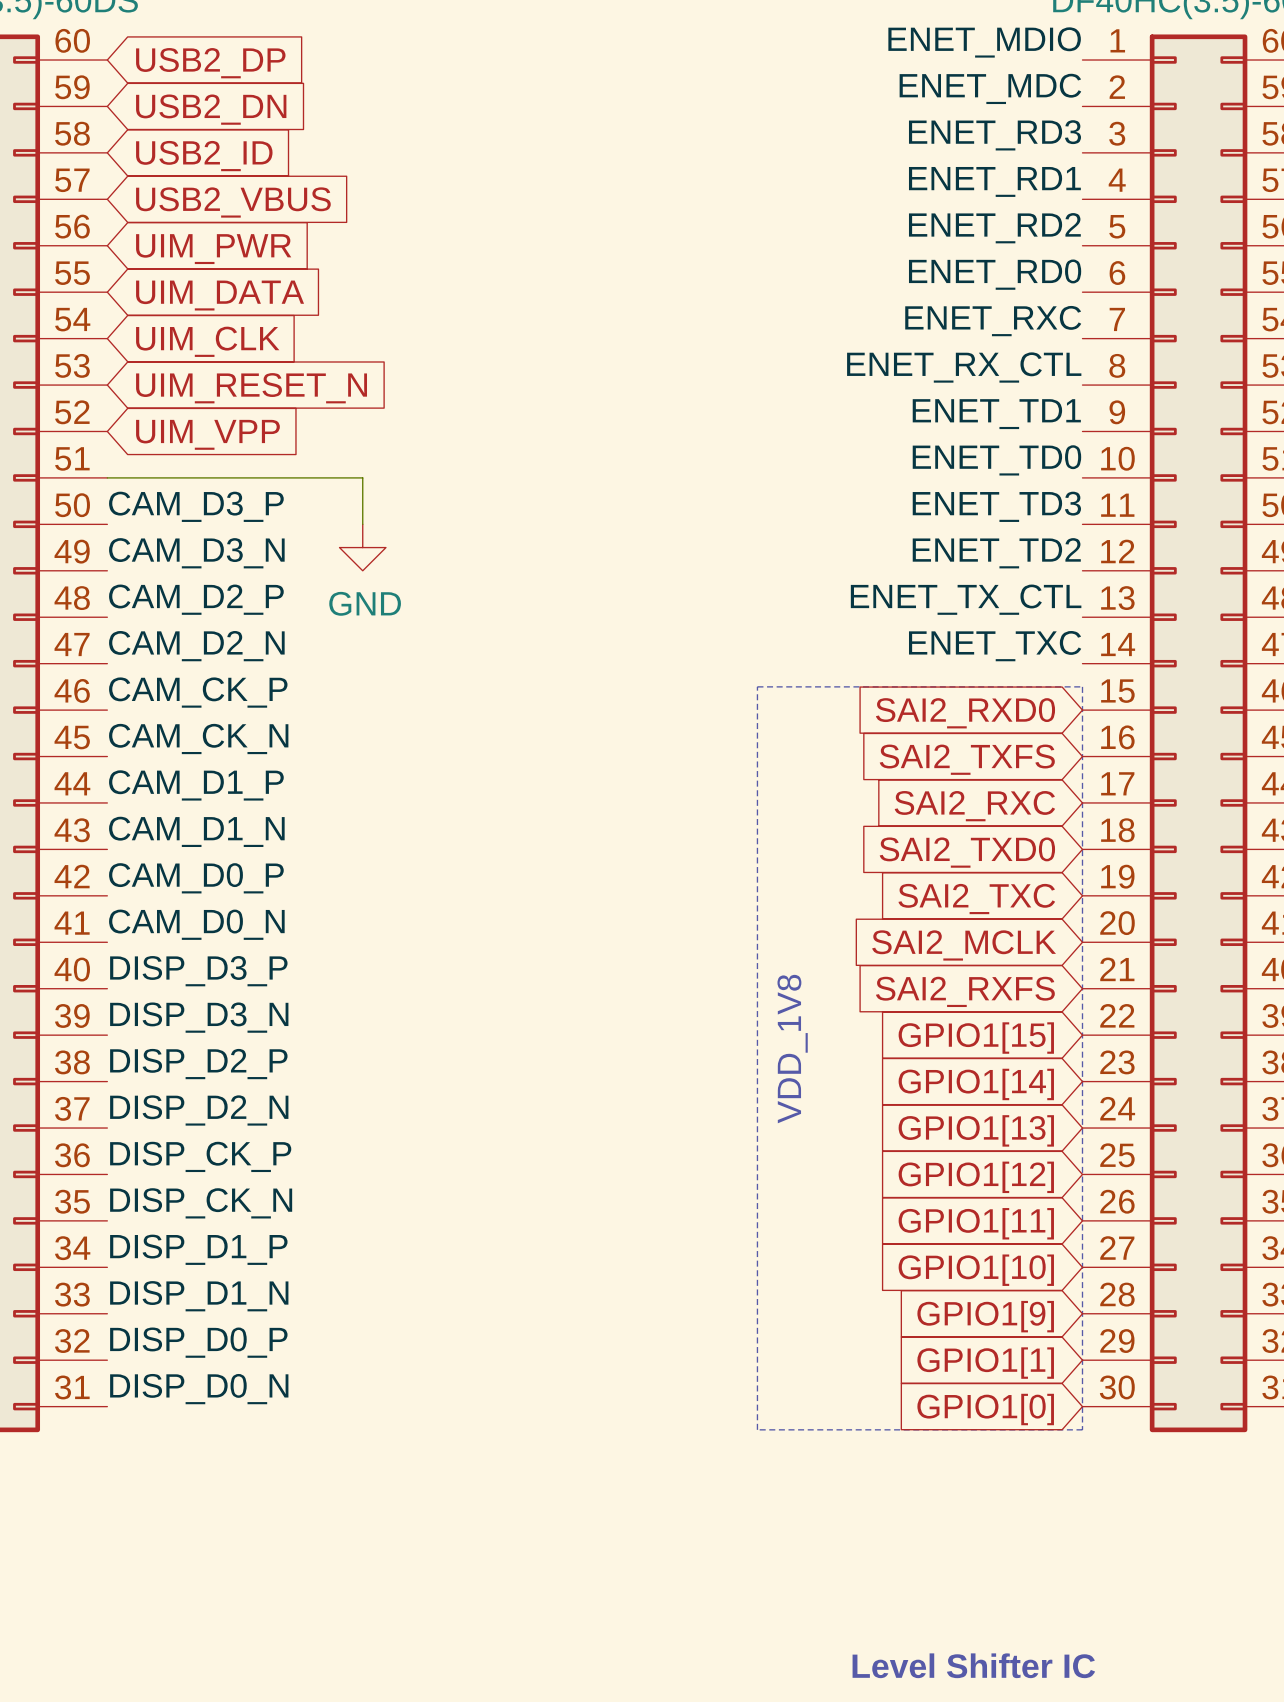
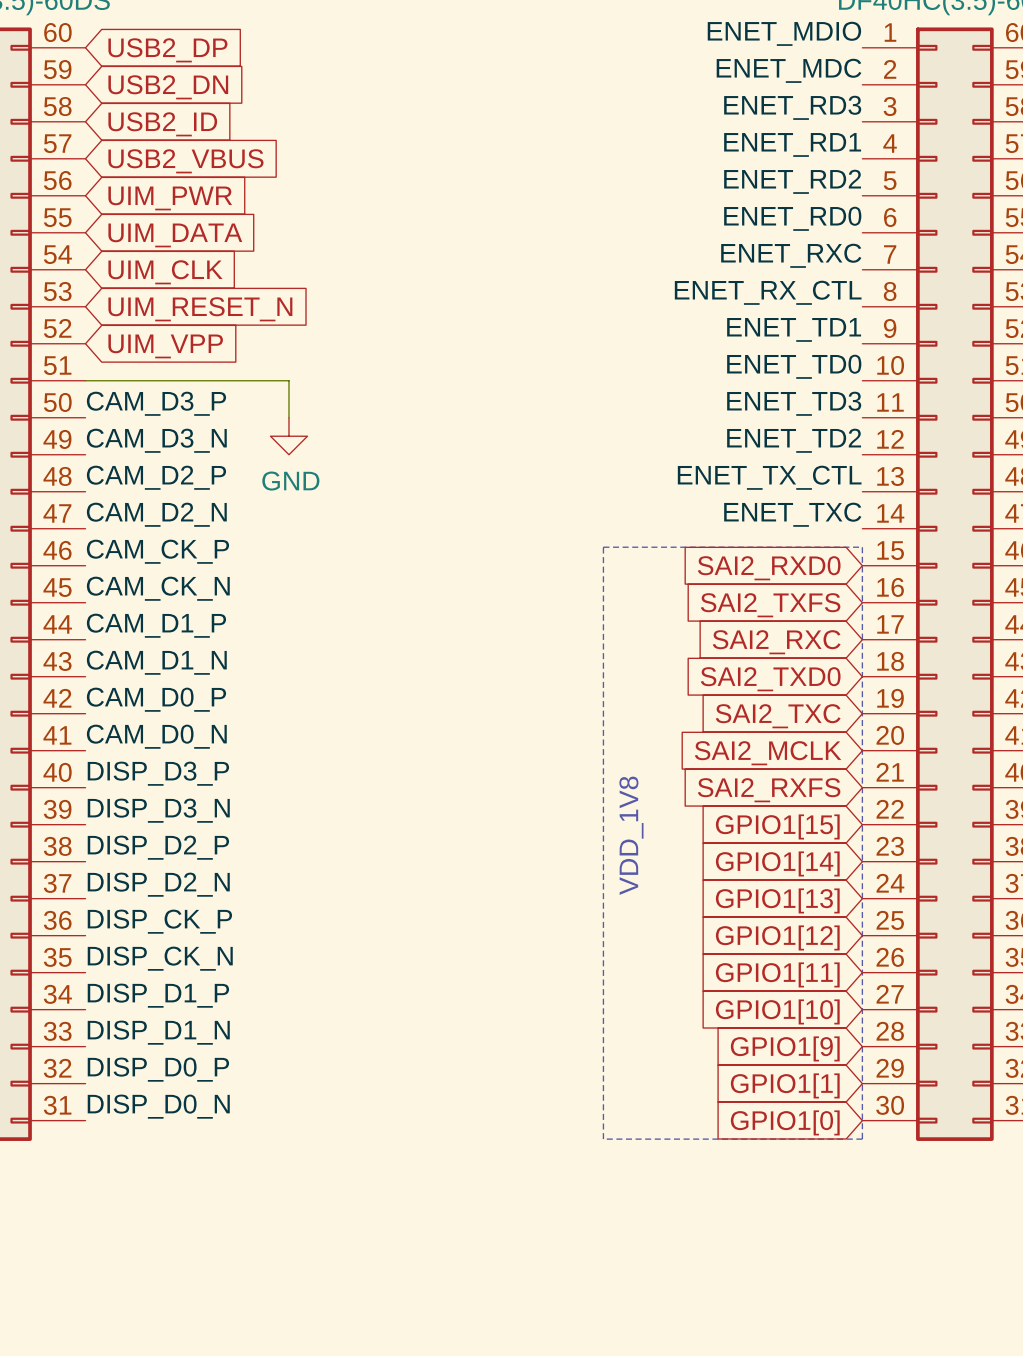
text: Level Shifter IC (973, 1665) -> none

